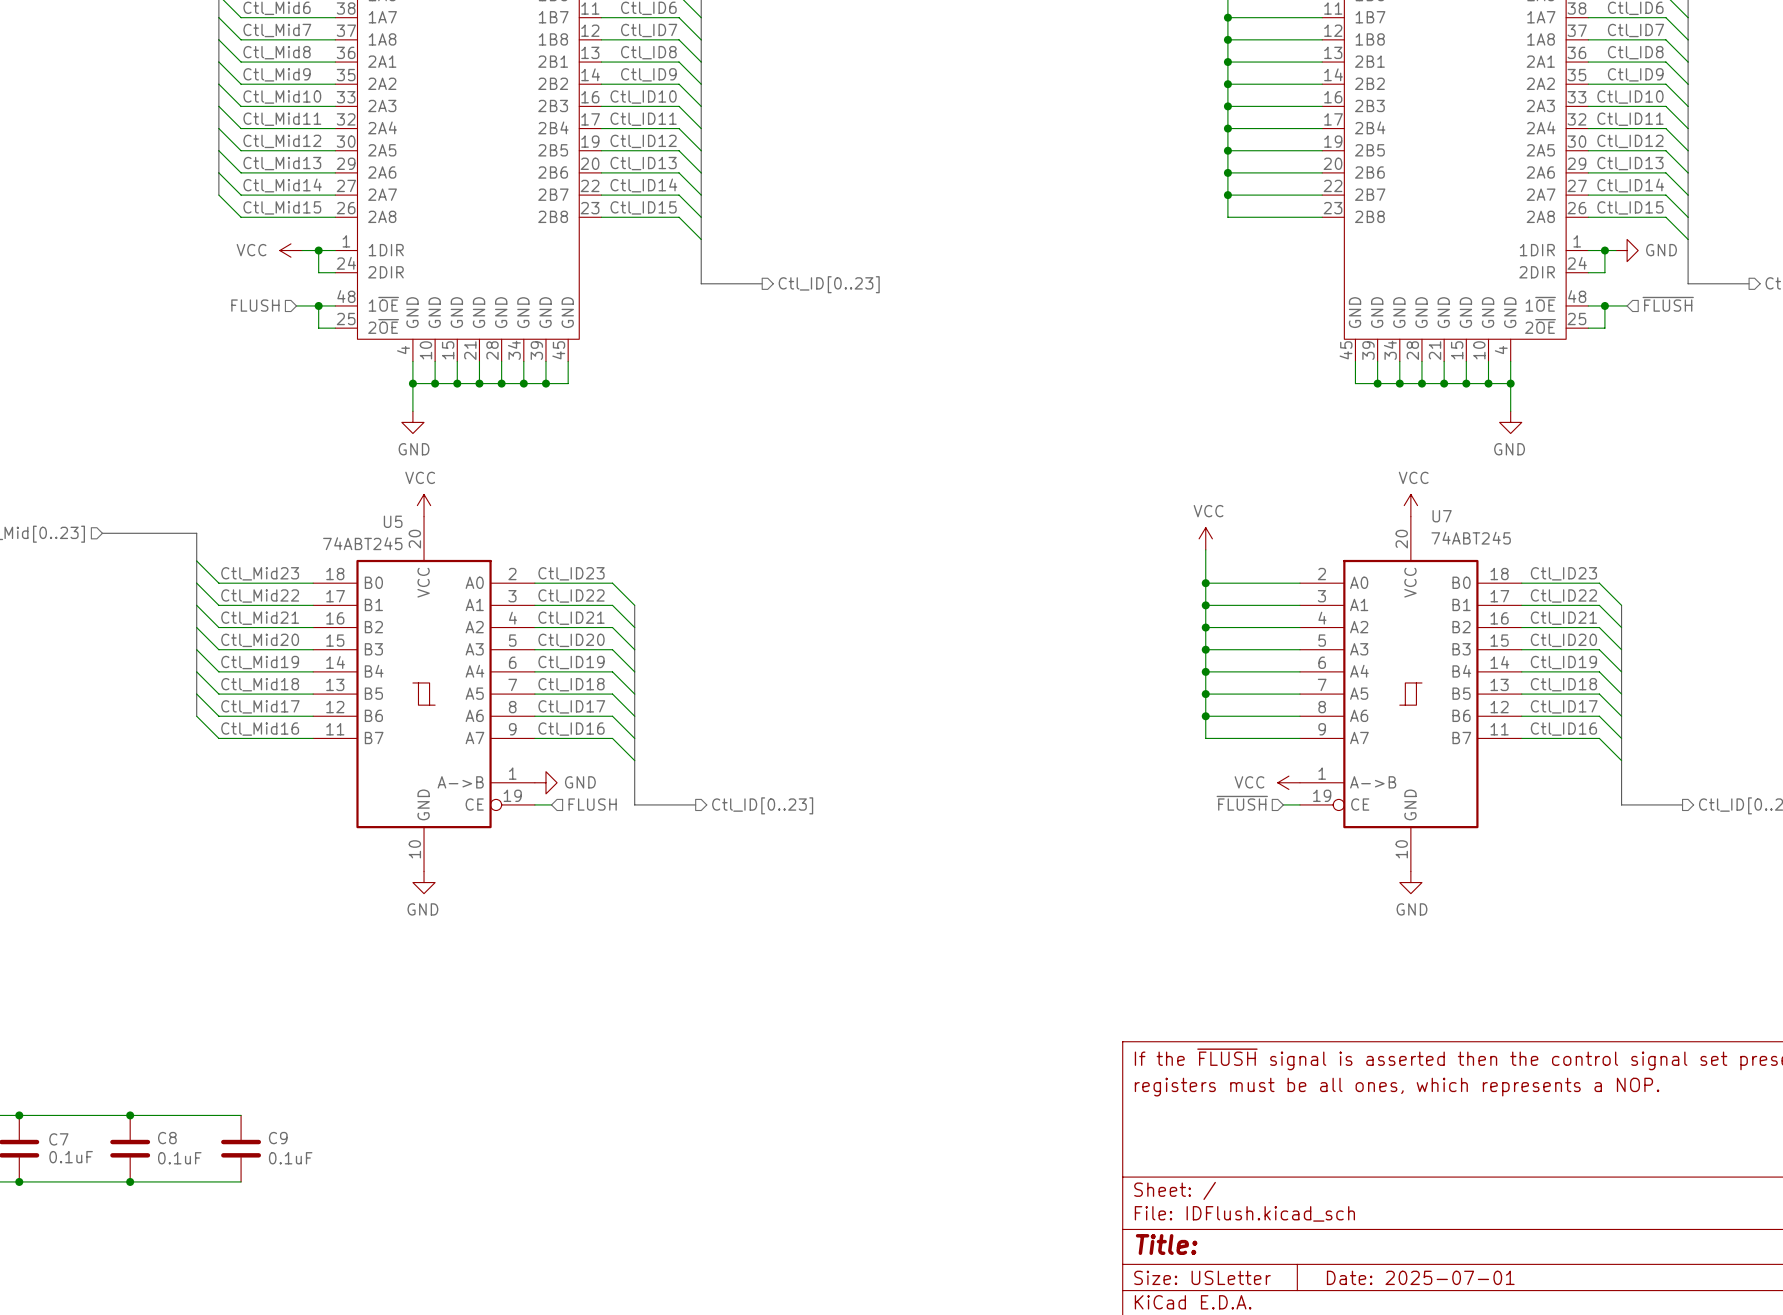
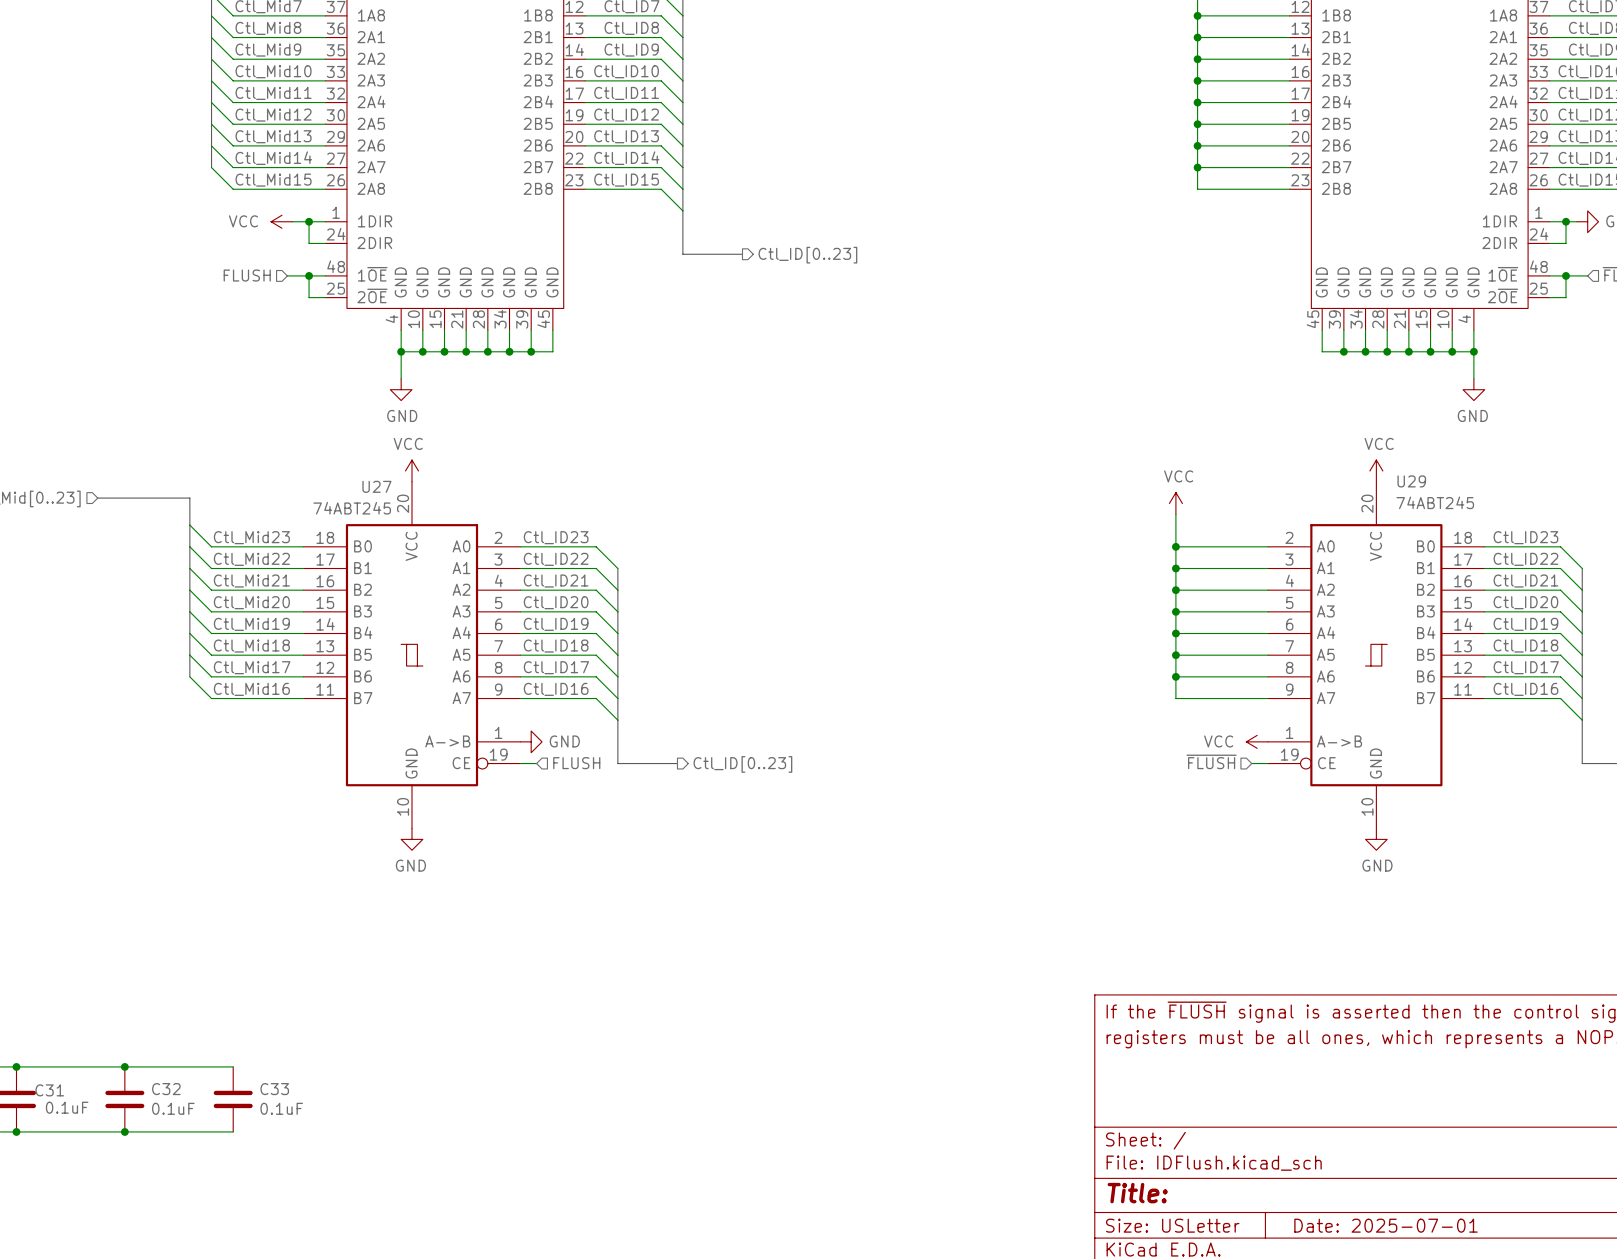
U7 name: U7 (1442, 516) -> U29 (1411, 481)
U5 name: U5 (393, 521) -> U27 (376, 486)
C8 name: C8 (167, 1138) -> C32 (166, 1089)
C9 name: C9 (278, 1138) -> C33 (274, 1089)
C7 name: C7 (58, 1139) -> C31 (49, 1090)

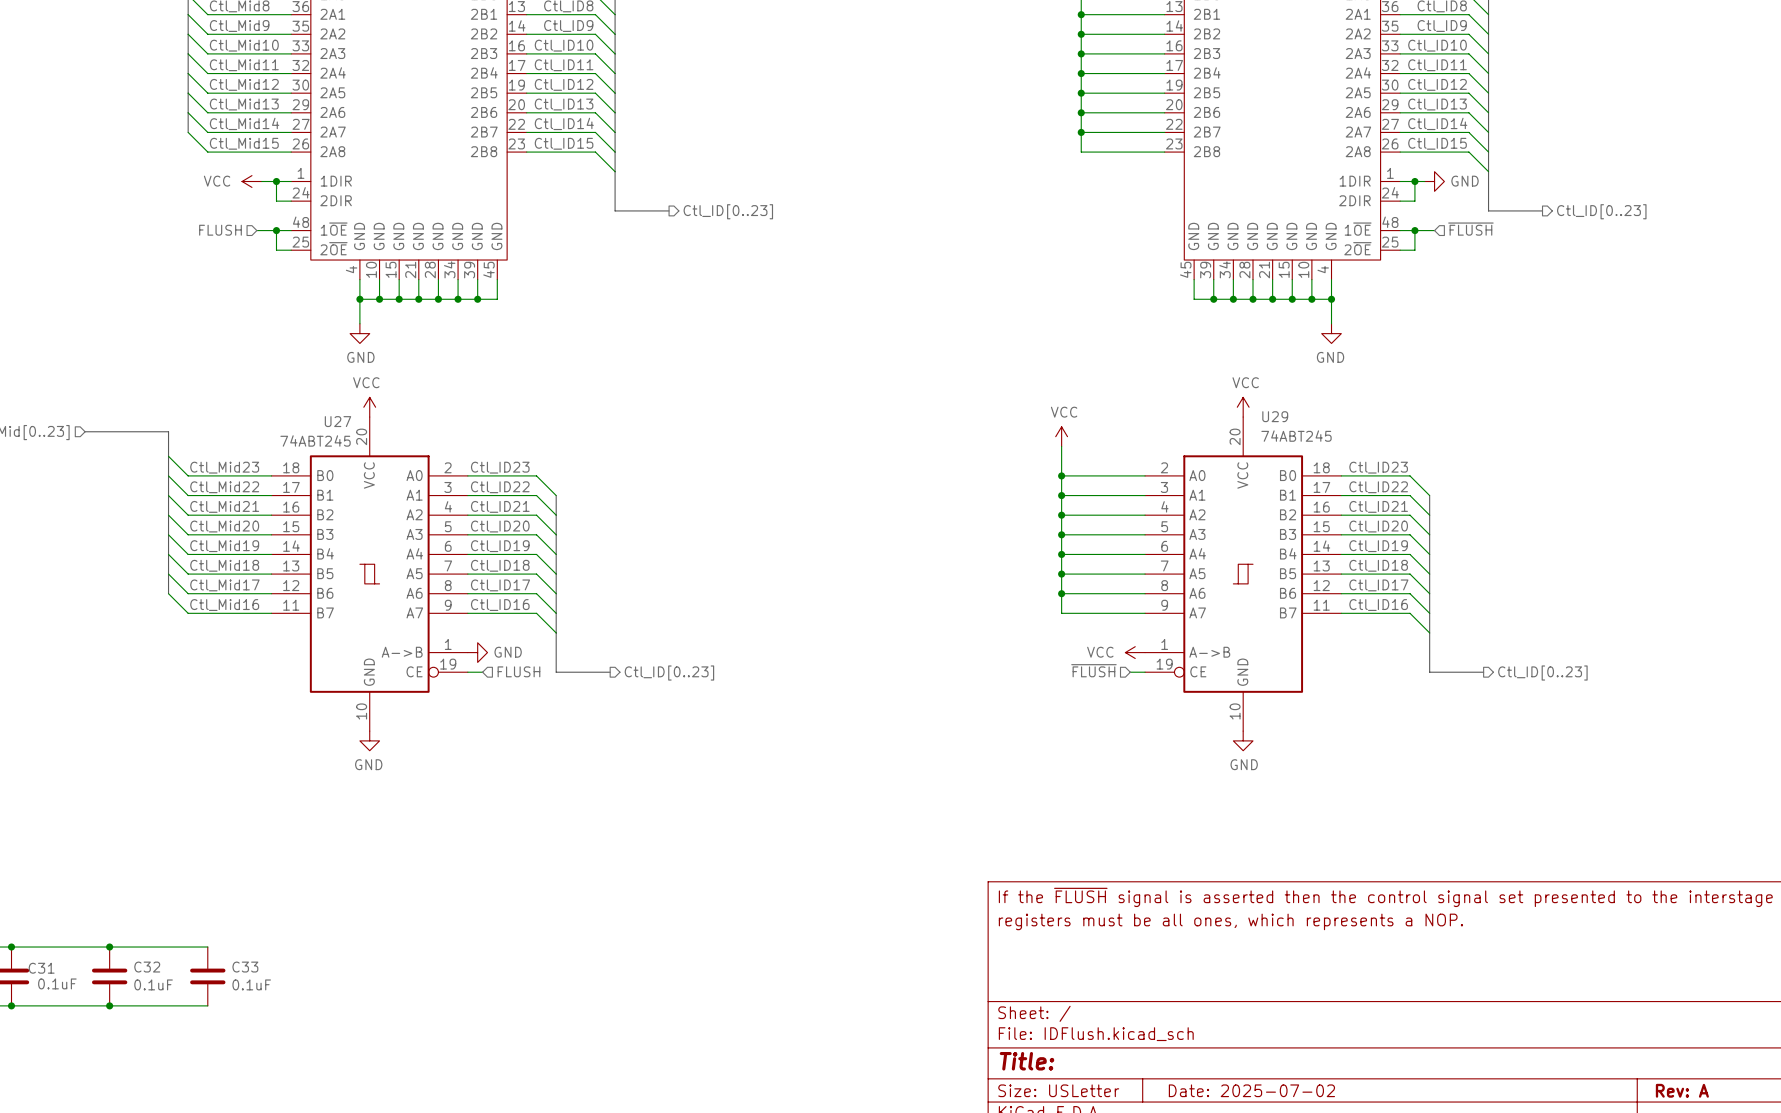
title block: Date: 2025-07-01 (1386, 1225) -> Date: 2025-07-02 (1251, 1090)

